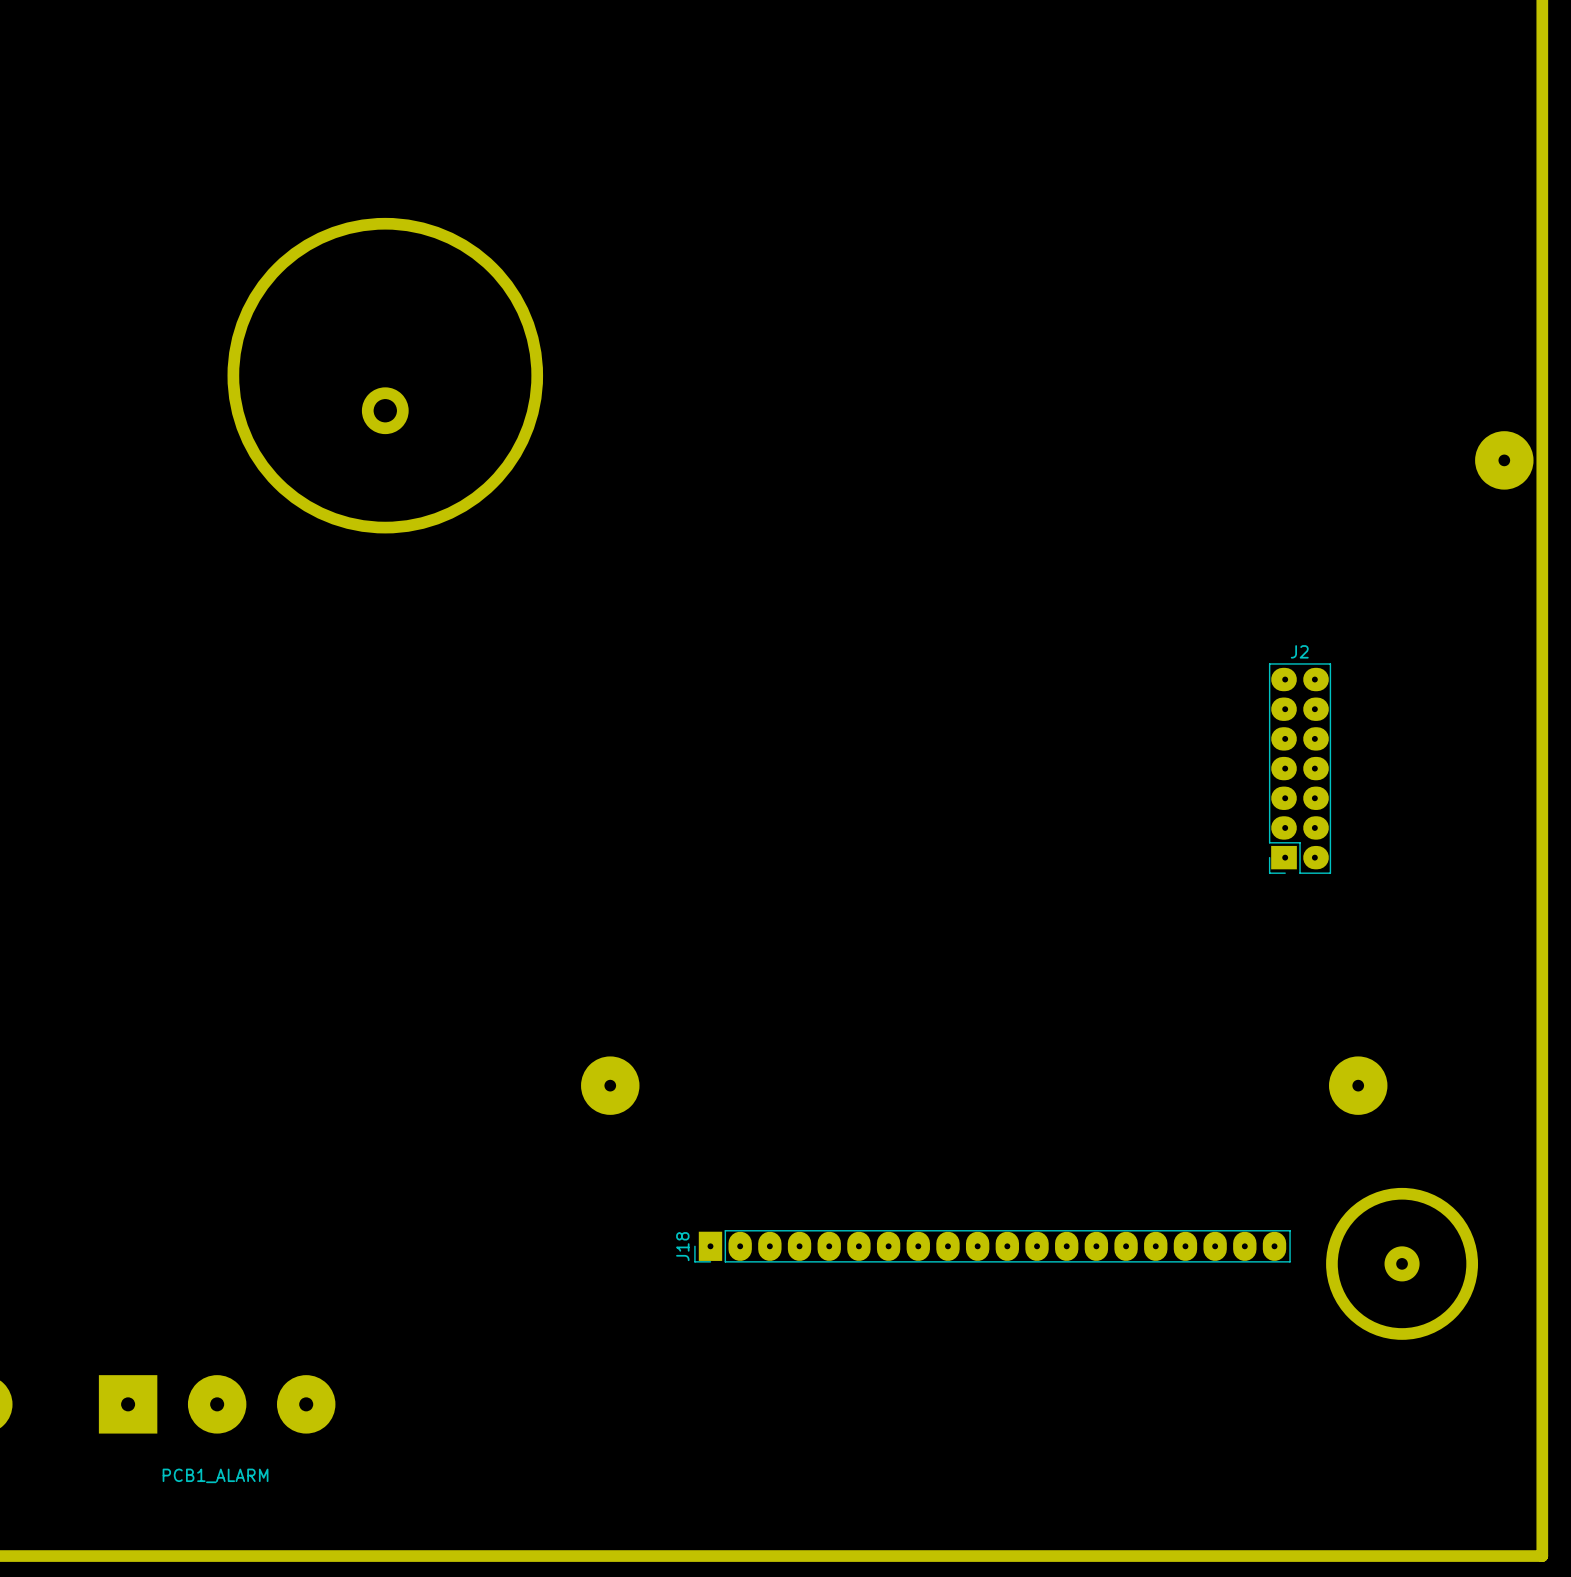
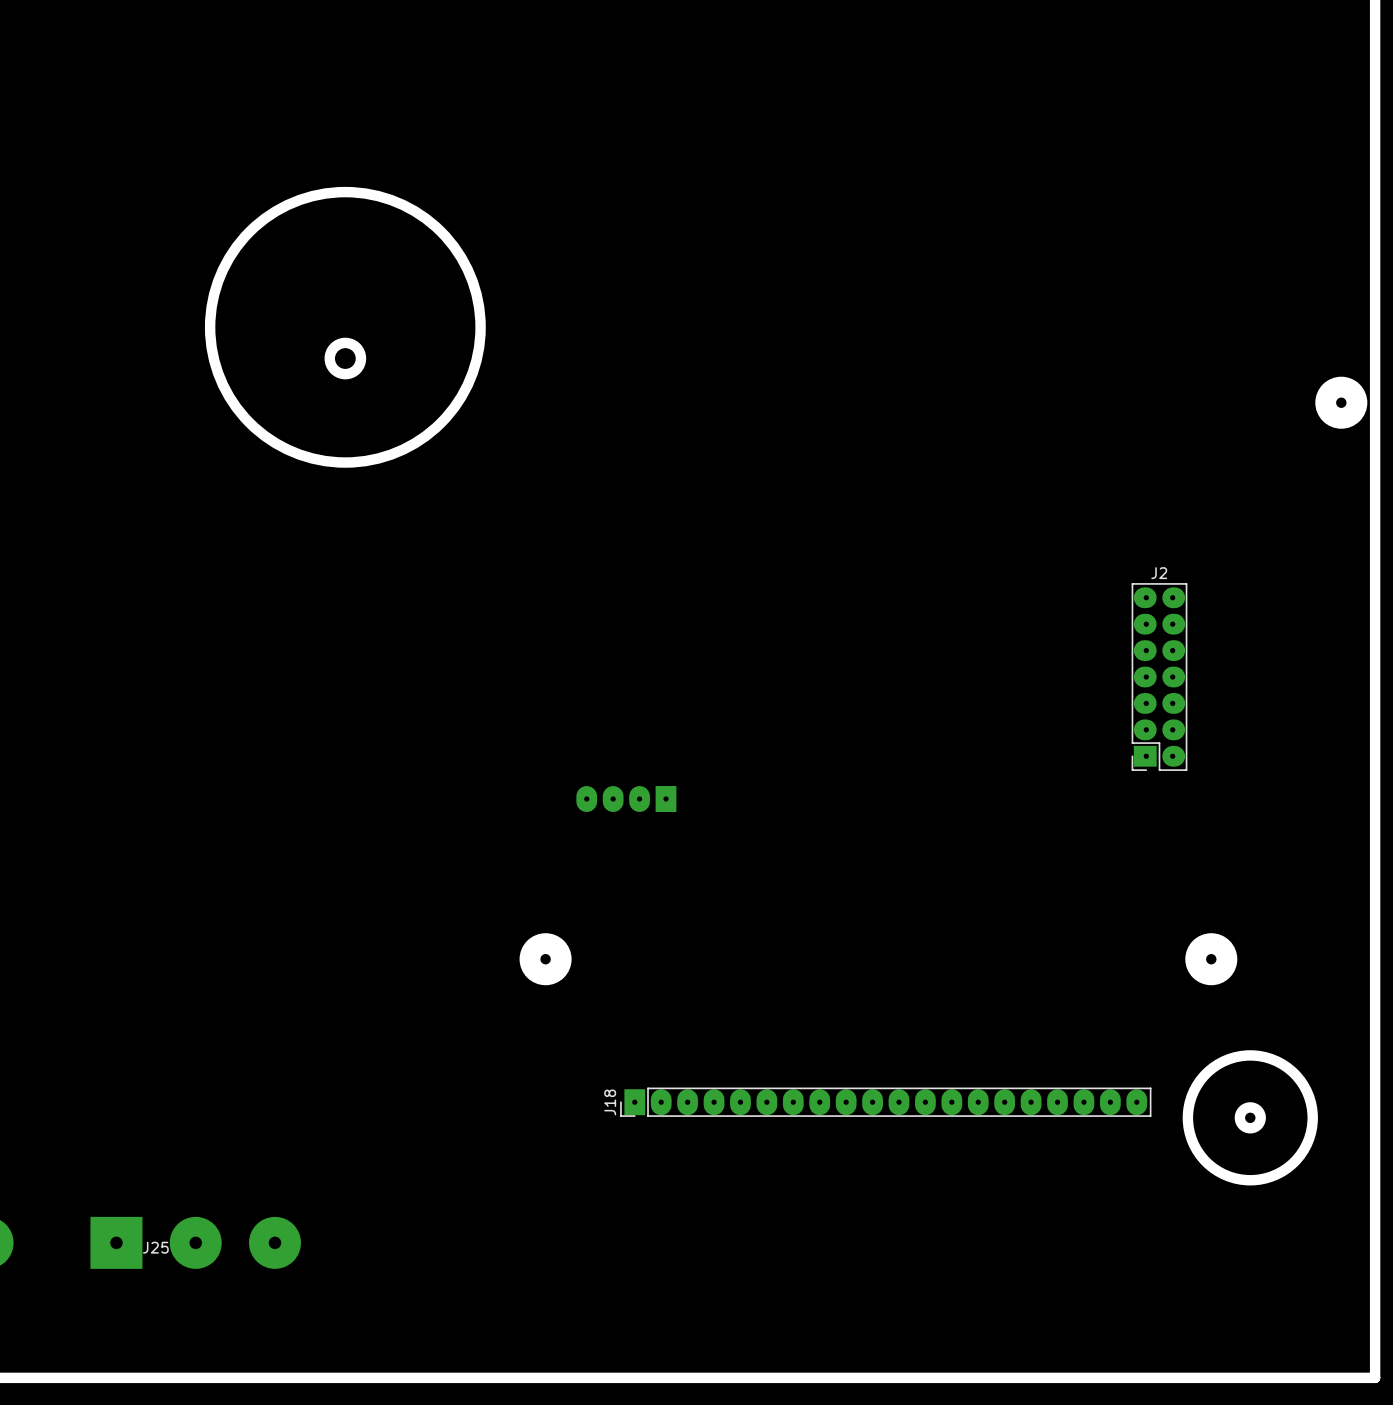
part: none -> (626, 799)
J25 name: none -> J25 (155, 1247)
J25 value: PCB1_ALARM (215, 1475) -> none

